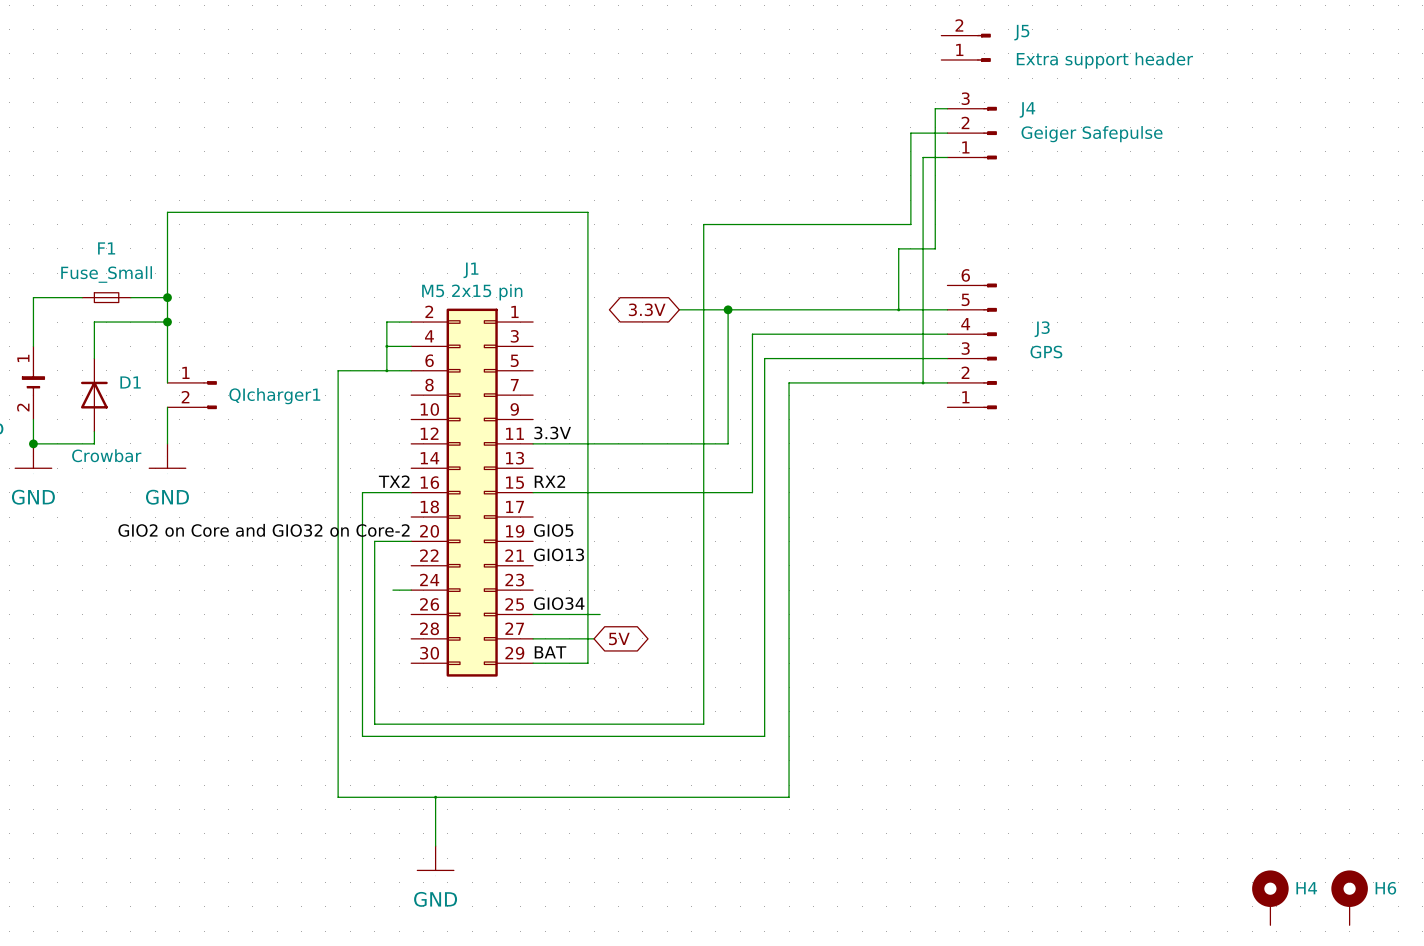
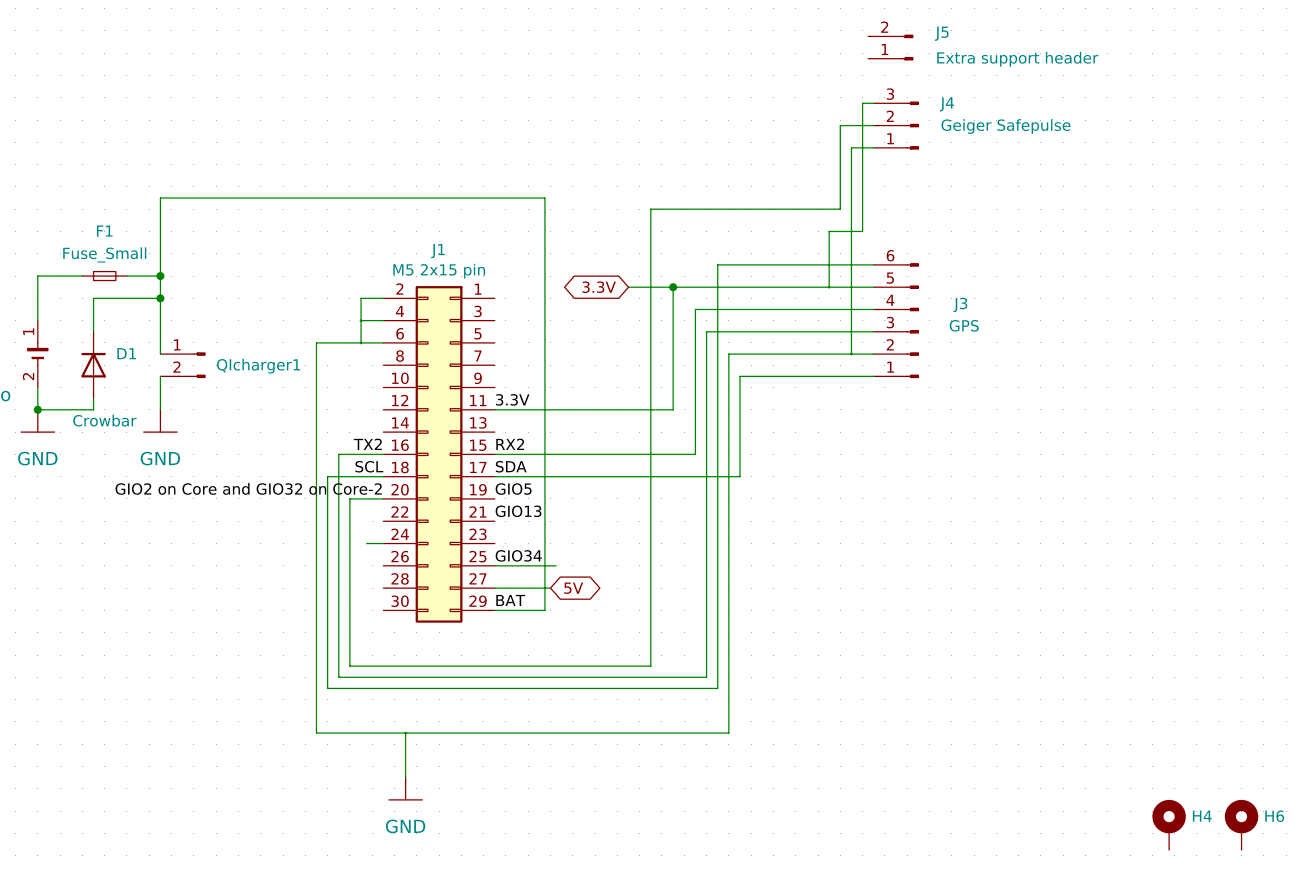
wire: none -> (873, 264) (717, 264) (717, 688) (327, 688) (327, 476) (383, 476)
wire: none -> (873, 376) (740, 376) (740, 476) (494, 476)
label: none -> SCL (369, 466)
label: none -> SDA (511, 466)

